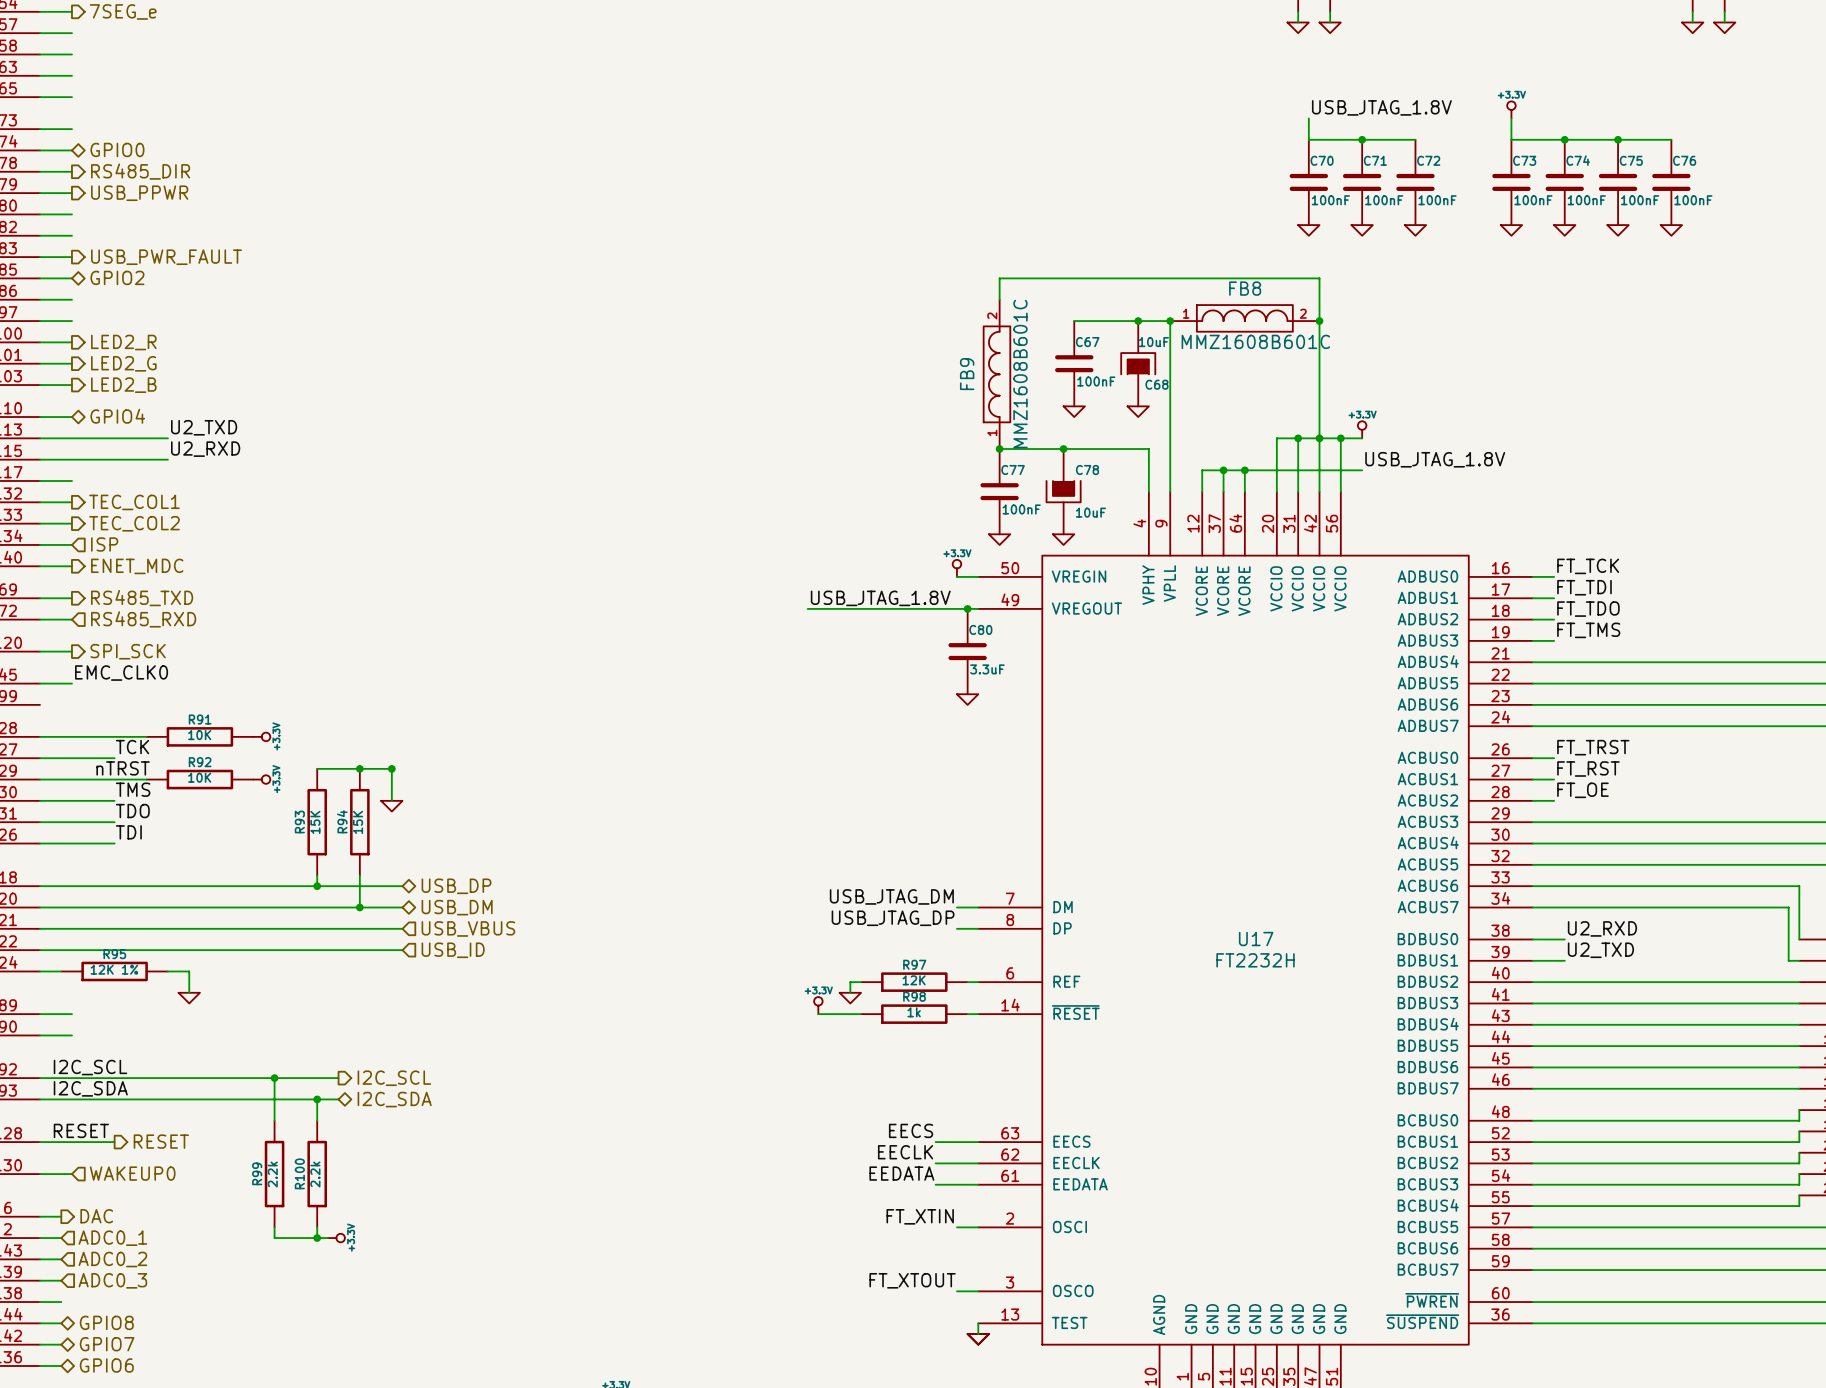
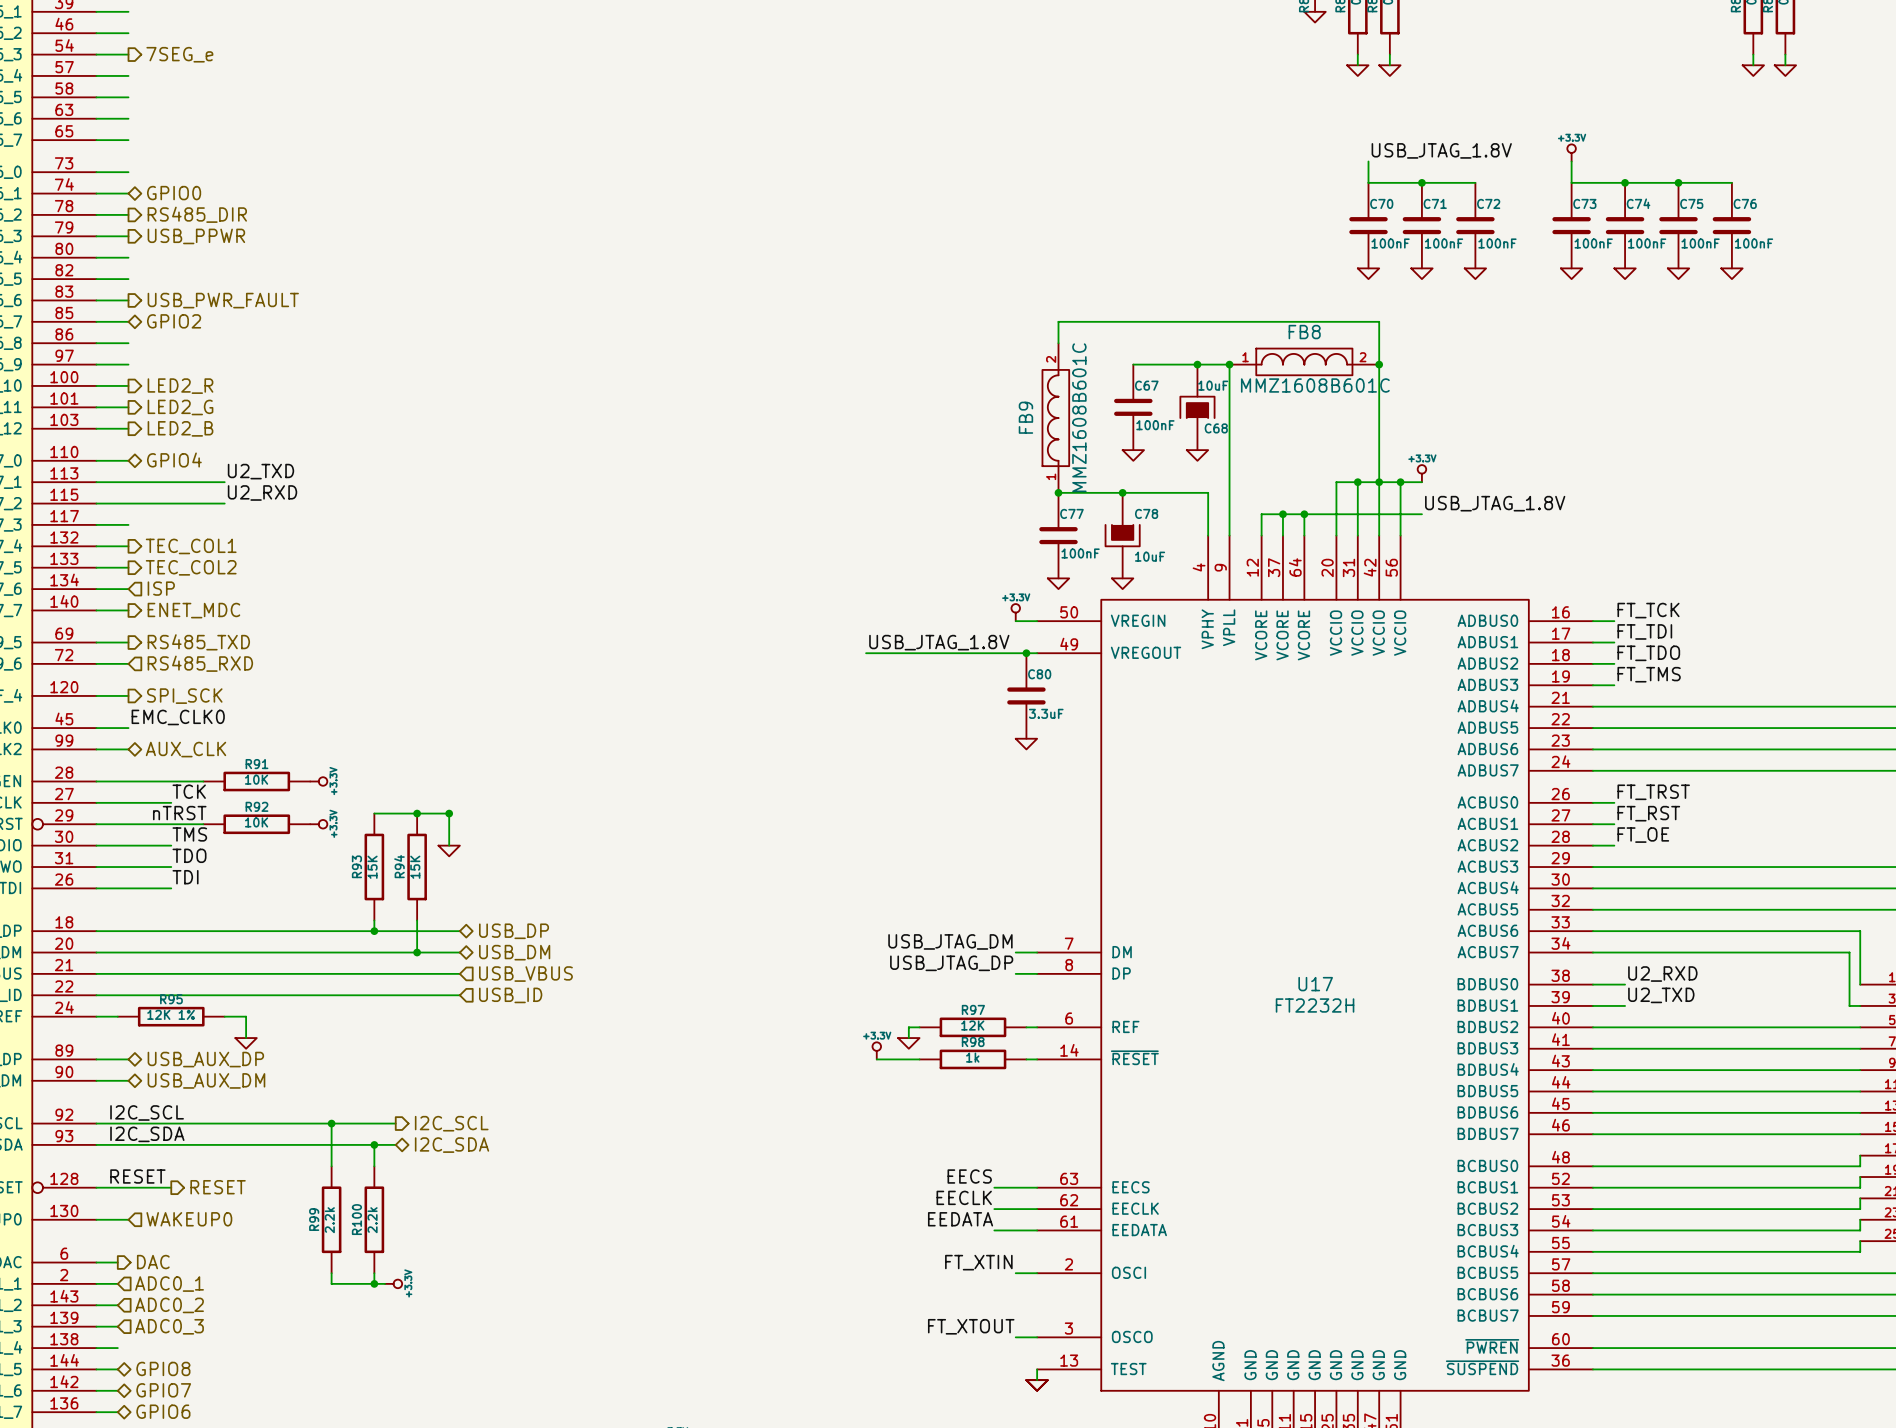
wire: none -> (96, 749) (128, 749)
hierarchical label: none -> AUX_CLK (185, 749)
hierarchical label: none -> USB_AUX_DP (205, 1059)
hierarchical label: none -> USB_AUX_DM (206, 1080)

